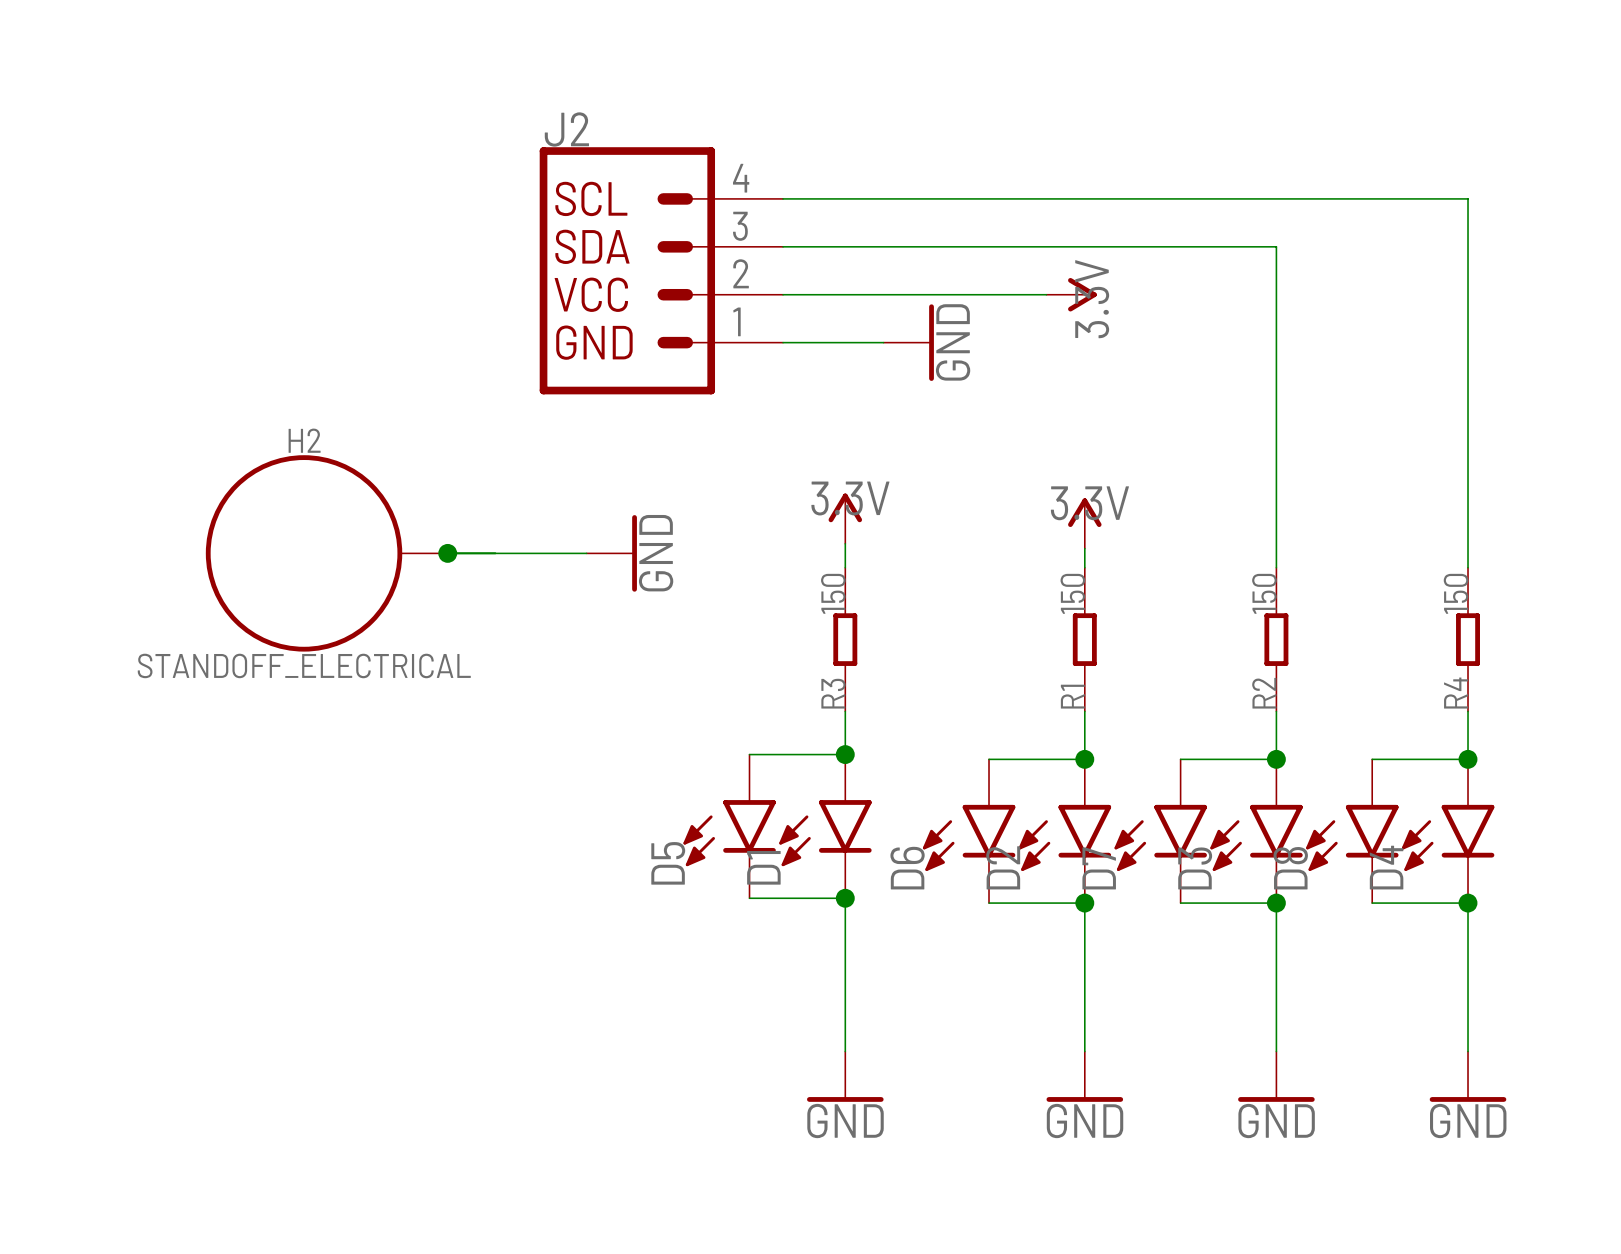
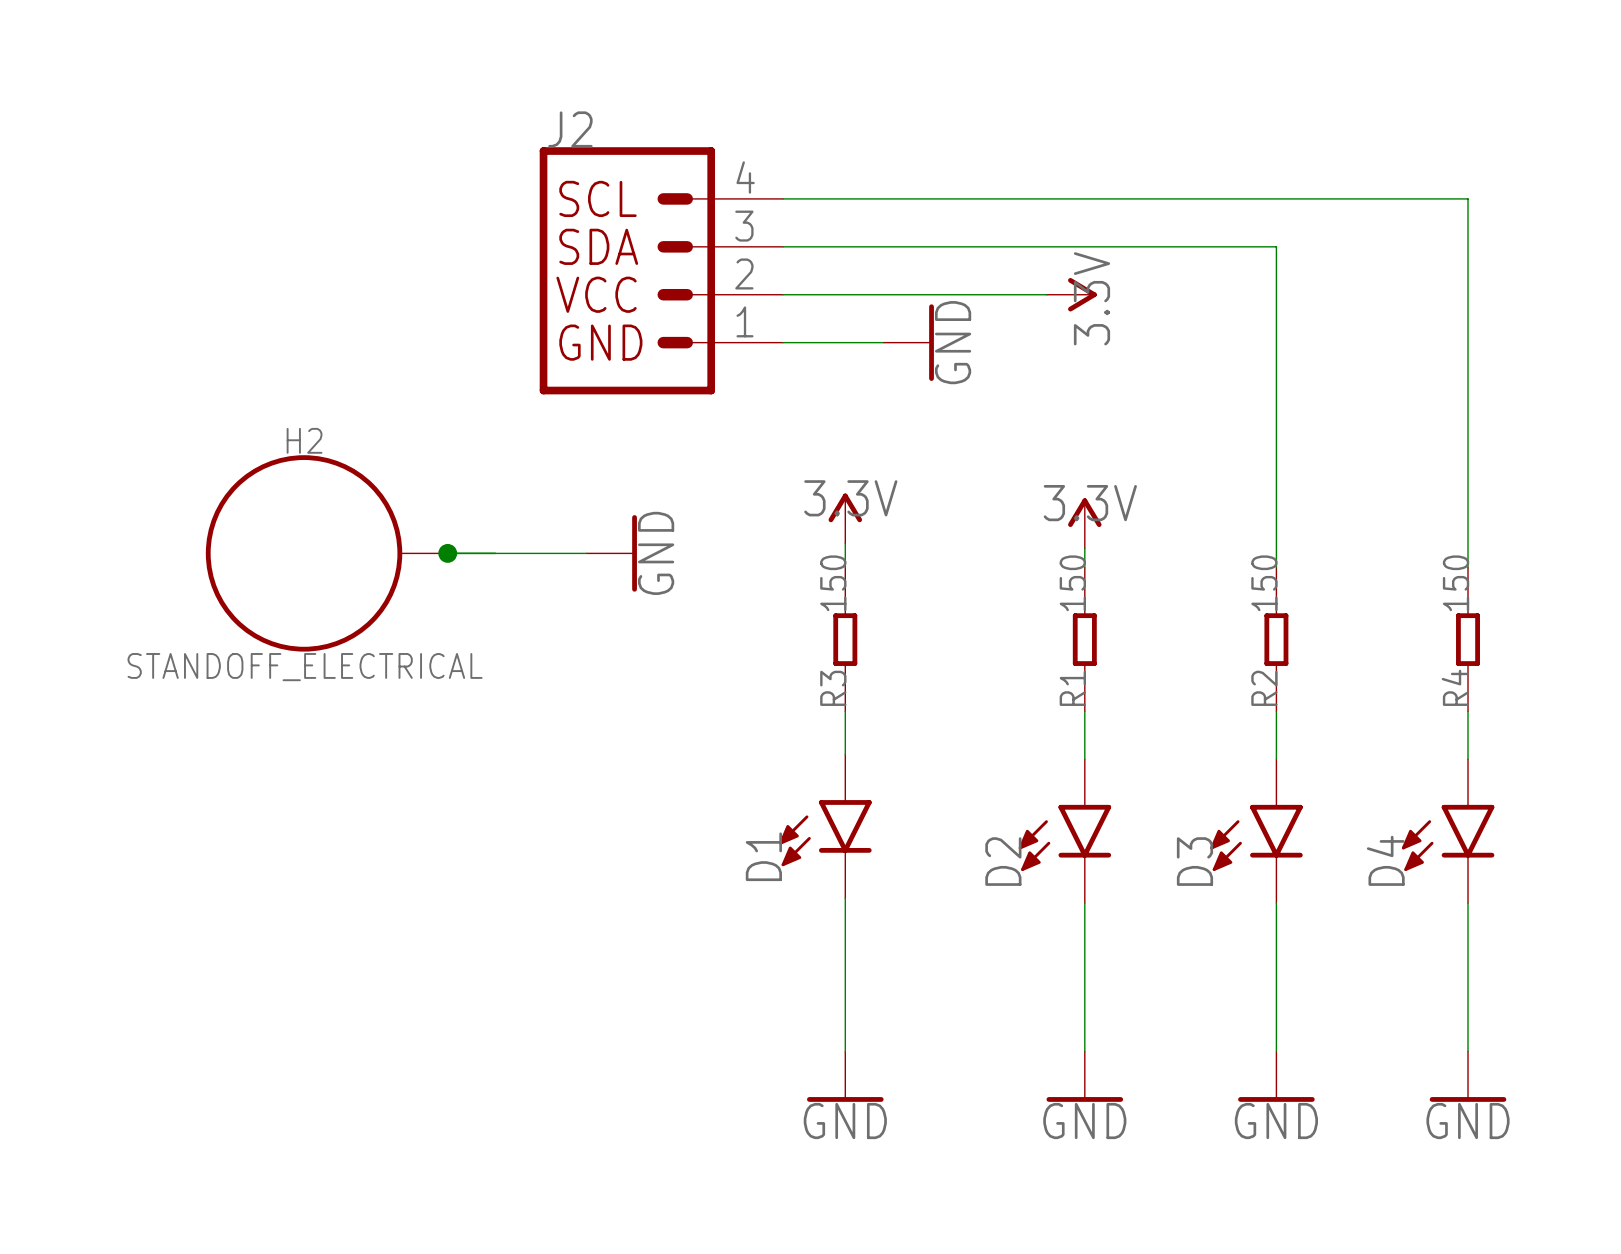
wire: (749, 754) (845, 754) -> none
junction: (845, 754) -> none
wire: (989, 759) (1084, 759) -> none
junction: (1084, 759) -> none
wire: (1180, 759) (1276, 759) -> none
junction: (1276, 759) -> none
wire: (1372, 759) (1468, 759) -> none
junction: (1468, 759) -> none
D5: (729, 826) -> none
D6: (969, 831) -> none
D7: (1160, 831) -> none
D8: (1352, 831) -> none
wire: (749, 898) (845, 898) -> none
junction: (845, 898) -> none
wire: (989, 903) (1084, 903) -> none
junction: (1084, 903) -> none
wire: (1180, 903) (1276, 903) -> none
junction: (1276, 903) -> none
wire: (1372, 903) (1468, 903) -> none
junction: (1468, 903) -> none

